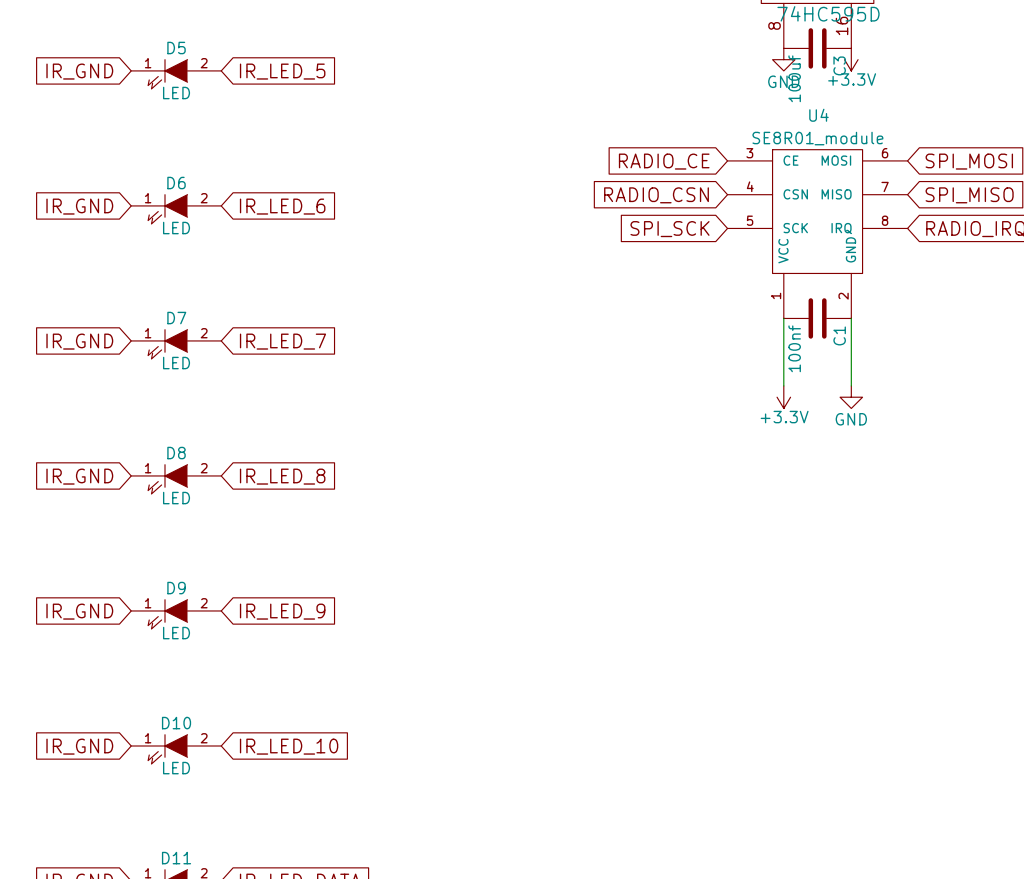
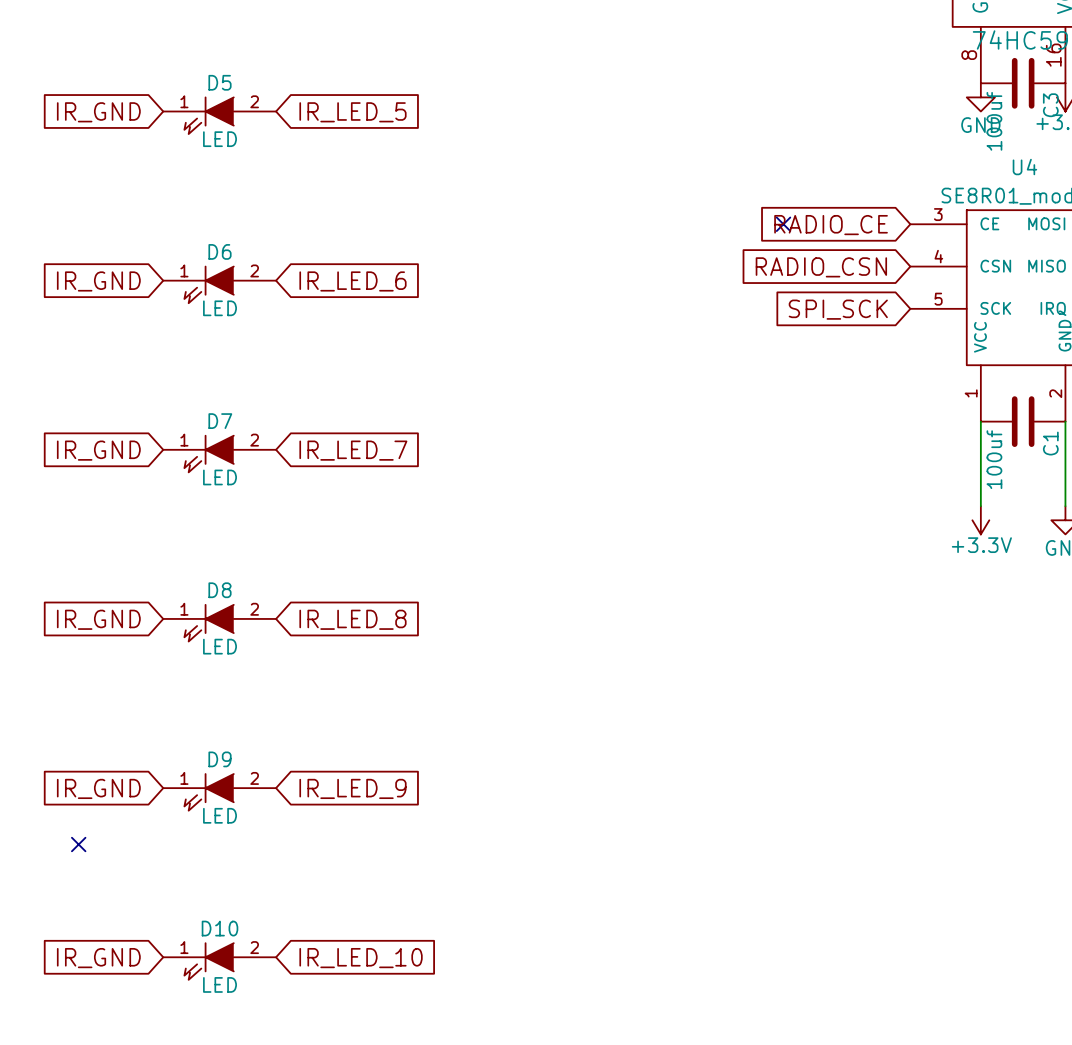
no-connect mark: none -> (783, 224)
C1 value: 100nf (794, 348) -> 100uf (994, 459)
no-connect mark: none -> (78, 844)

